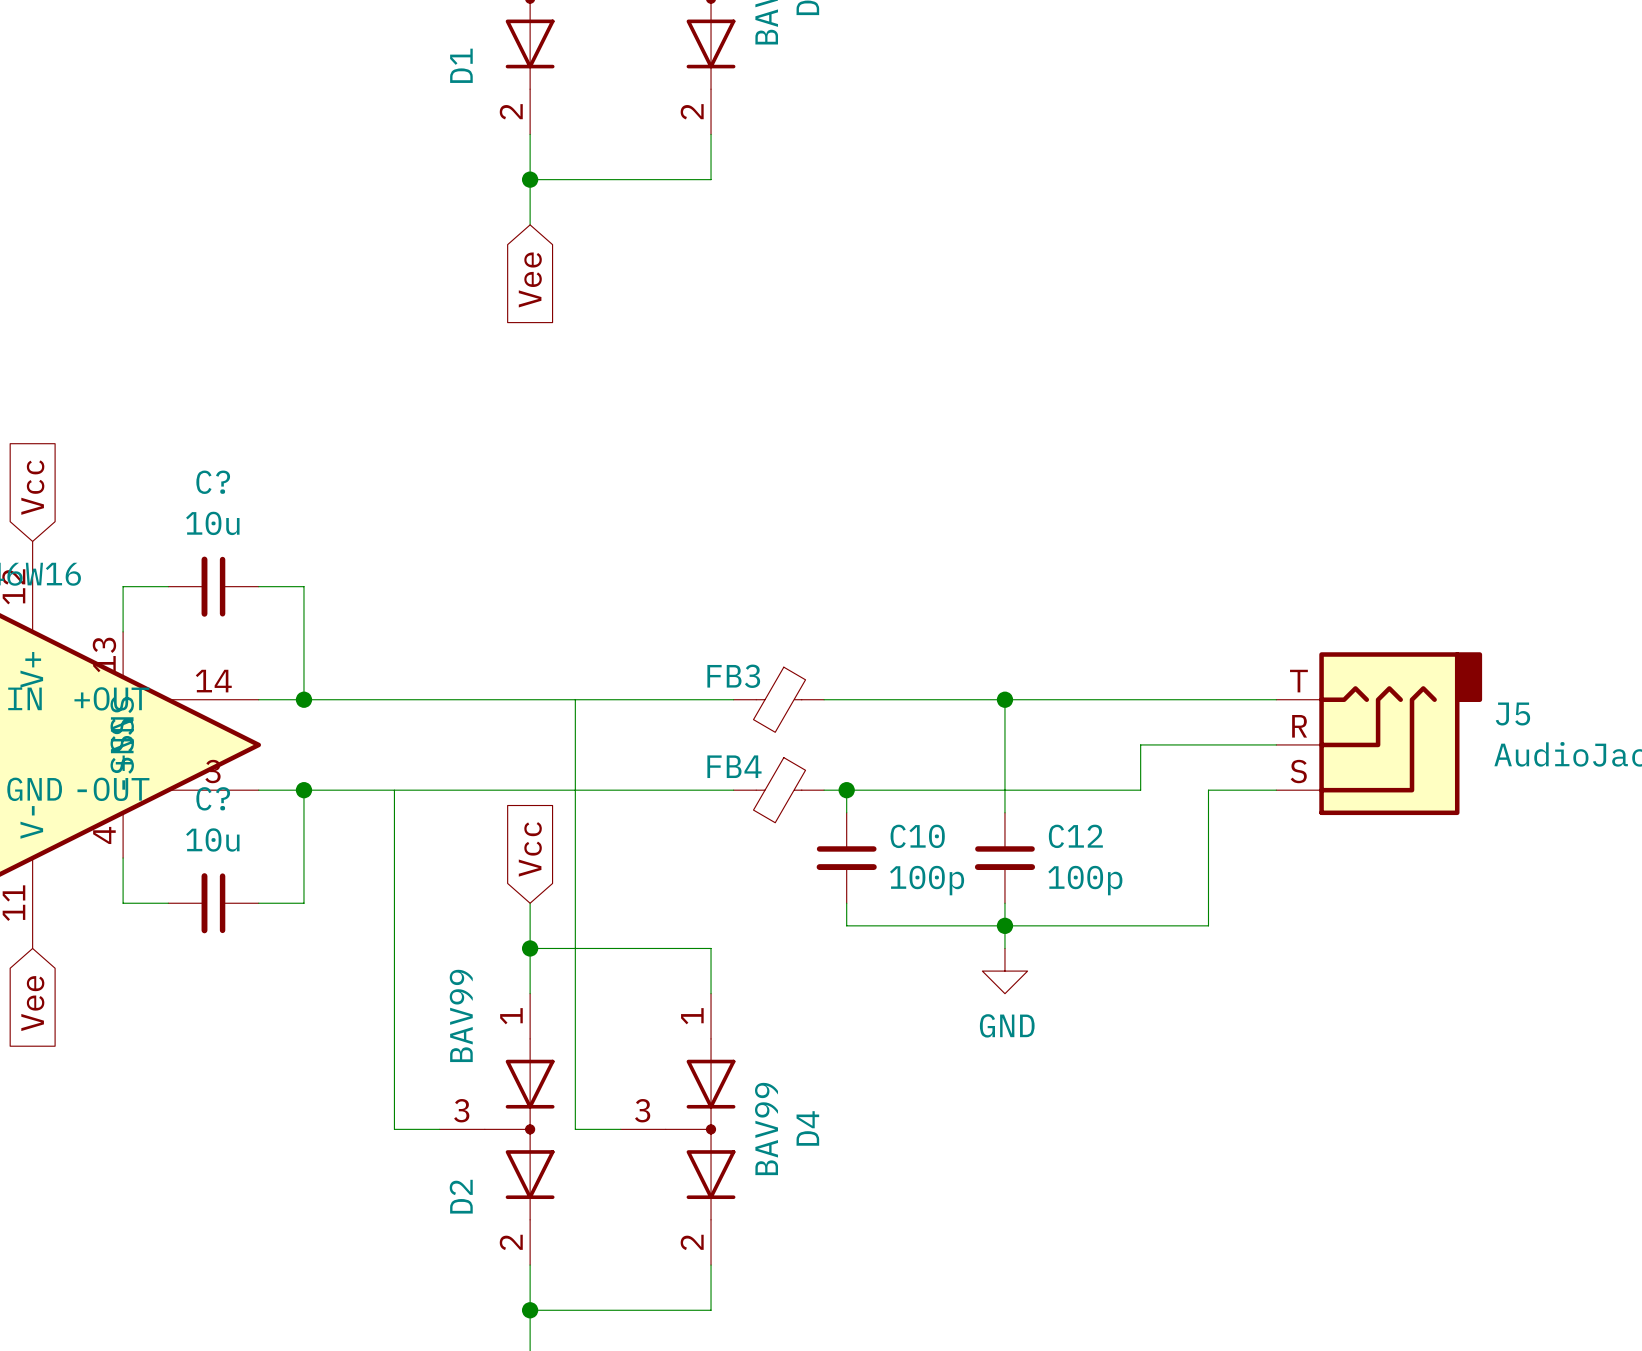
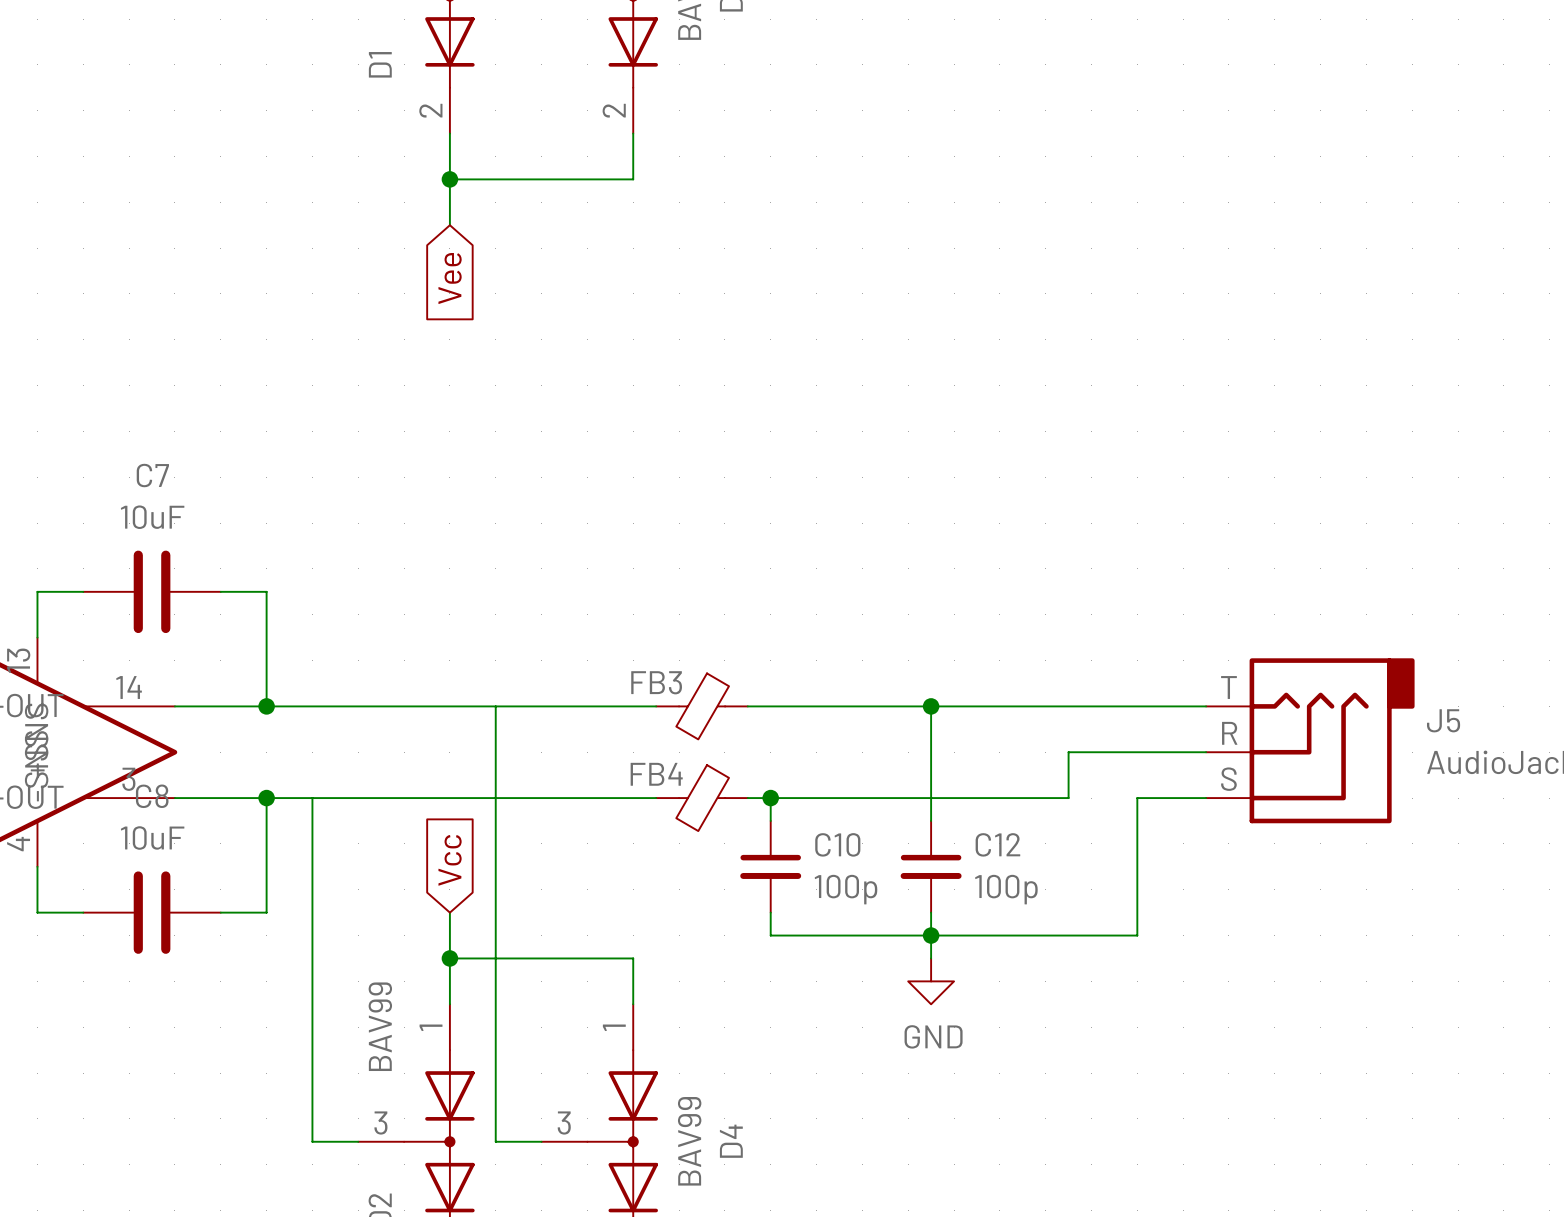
C?: 10u (213, 586) -> none
C7: none -> 10uF (152, 591)
wire: (258, 586) (303, 586) (303, 699) -> (220, 591) (266, 591) (266, 706)
junction position: (303, 699) -> (266, 706)
wire: (303, 790) (303, 903) (258, 903) -> (266, 798) (266, 912) (220, 912)
junction position: (303, 790) -> (266, 798)
C?: 10u (213, 903) -> none
C8: none -> 10uF (152, 912)

